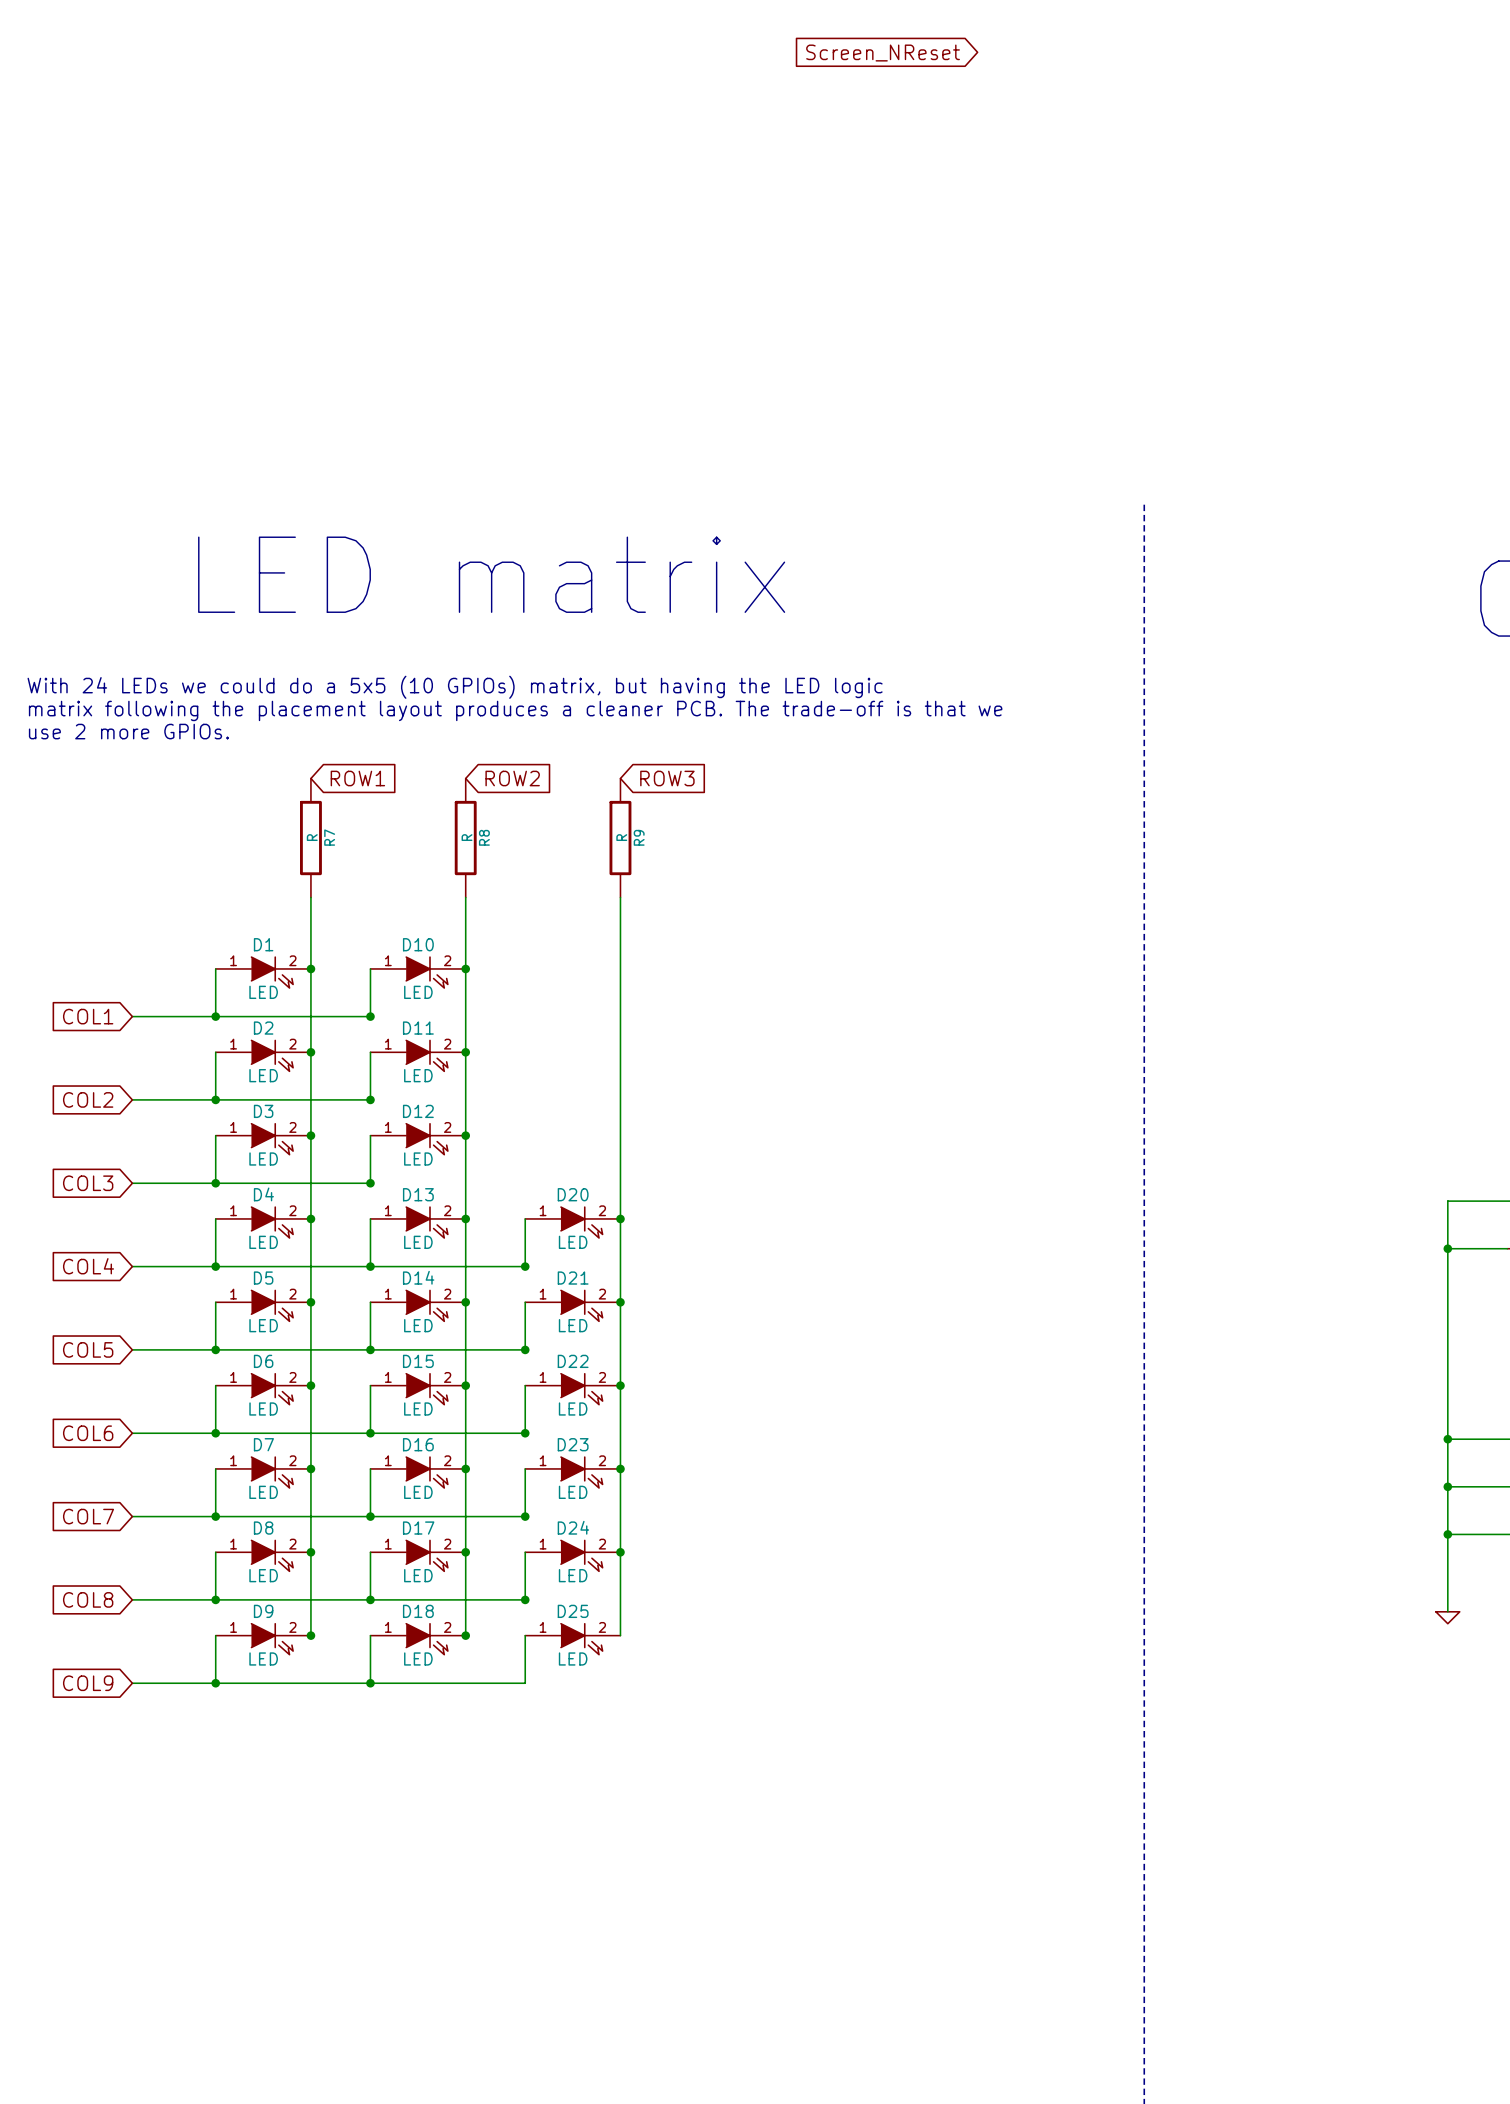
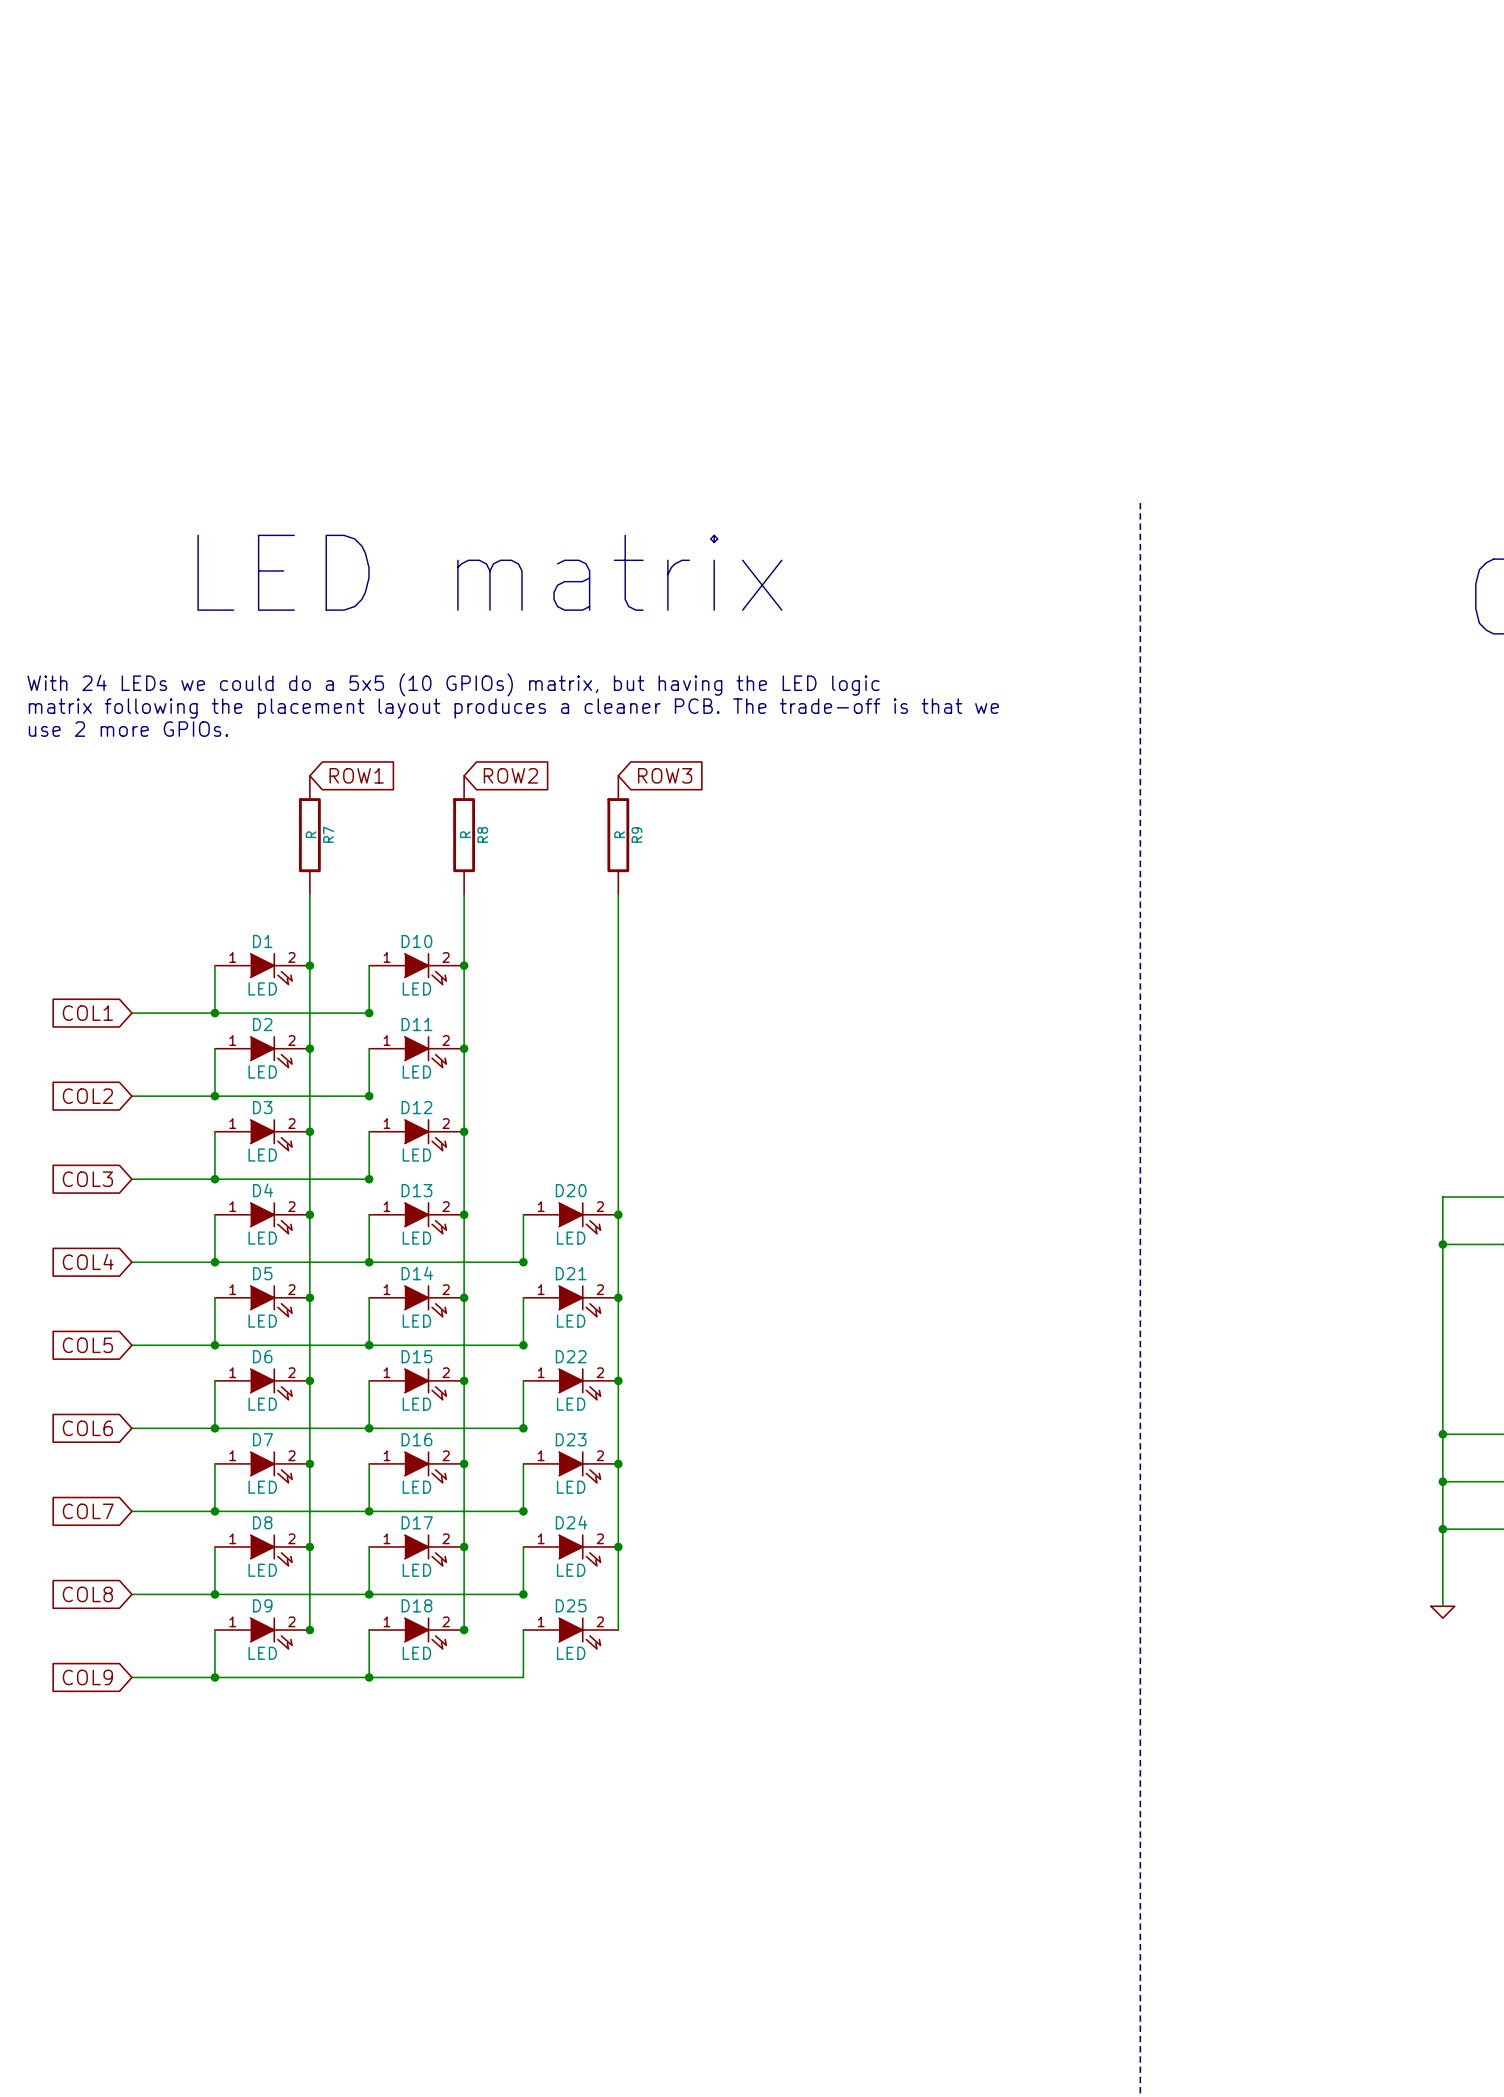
global label: Screen_NReset (883, 53) -> none

